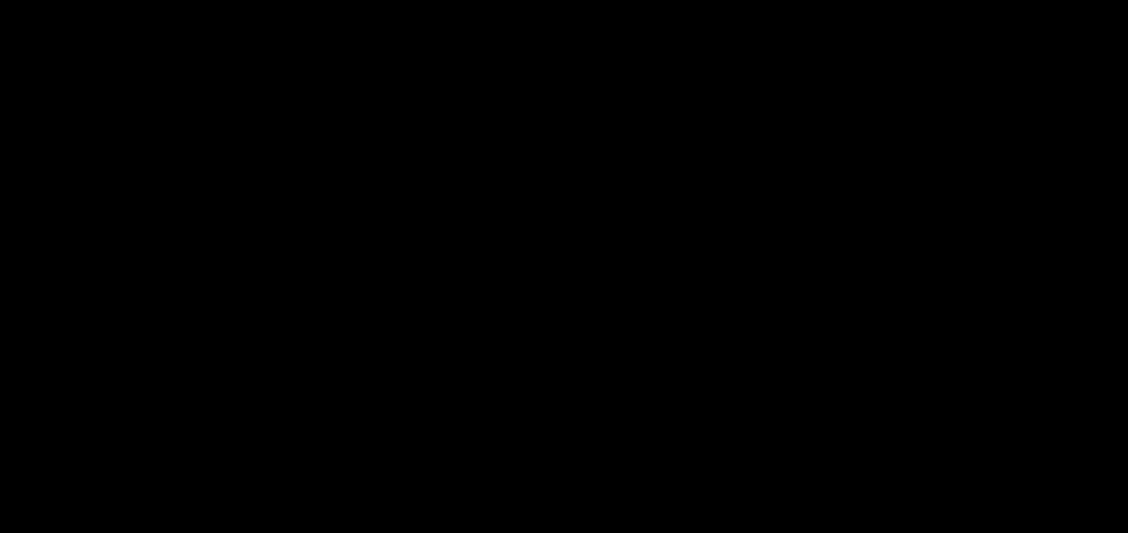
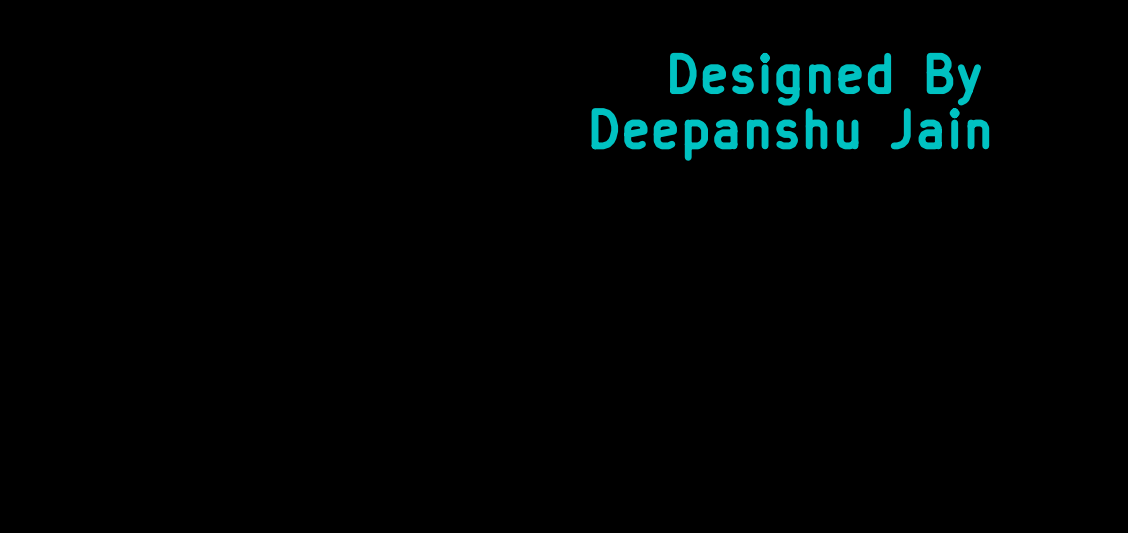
text: none -> Designed By (825, 79)
text: none -> Deepanshu Jain (790, 134)

